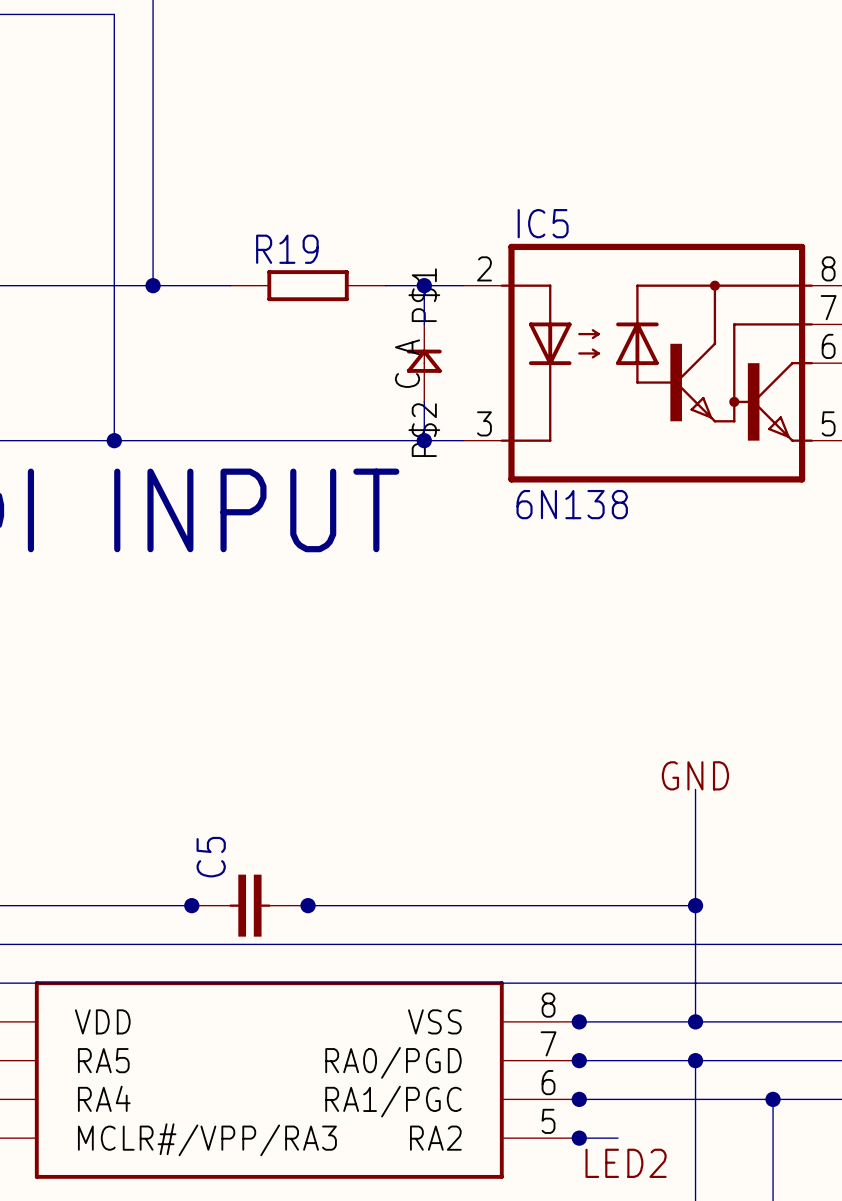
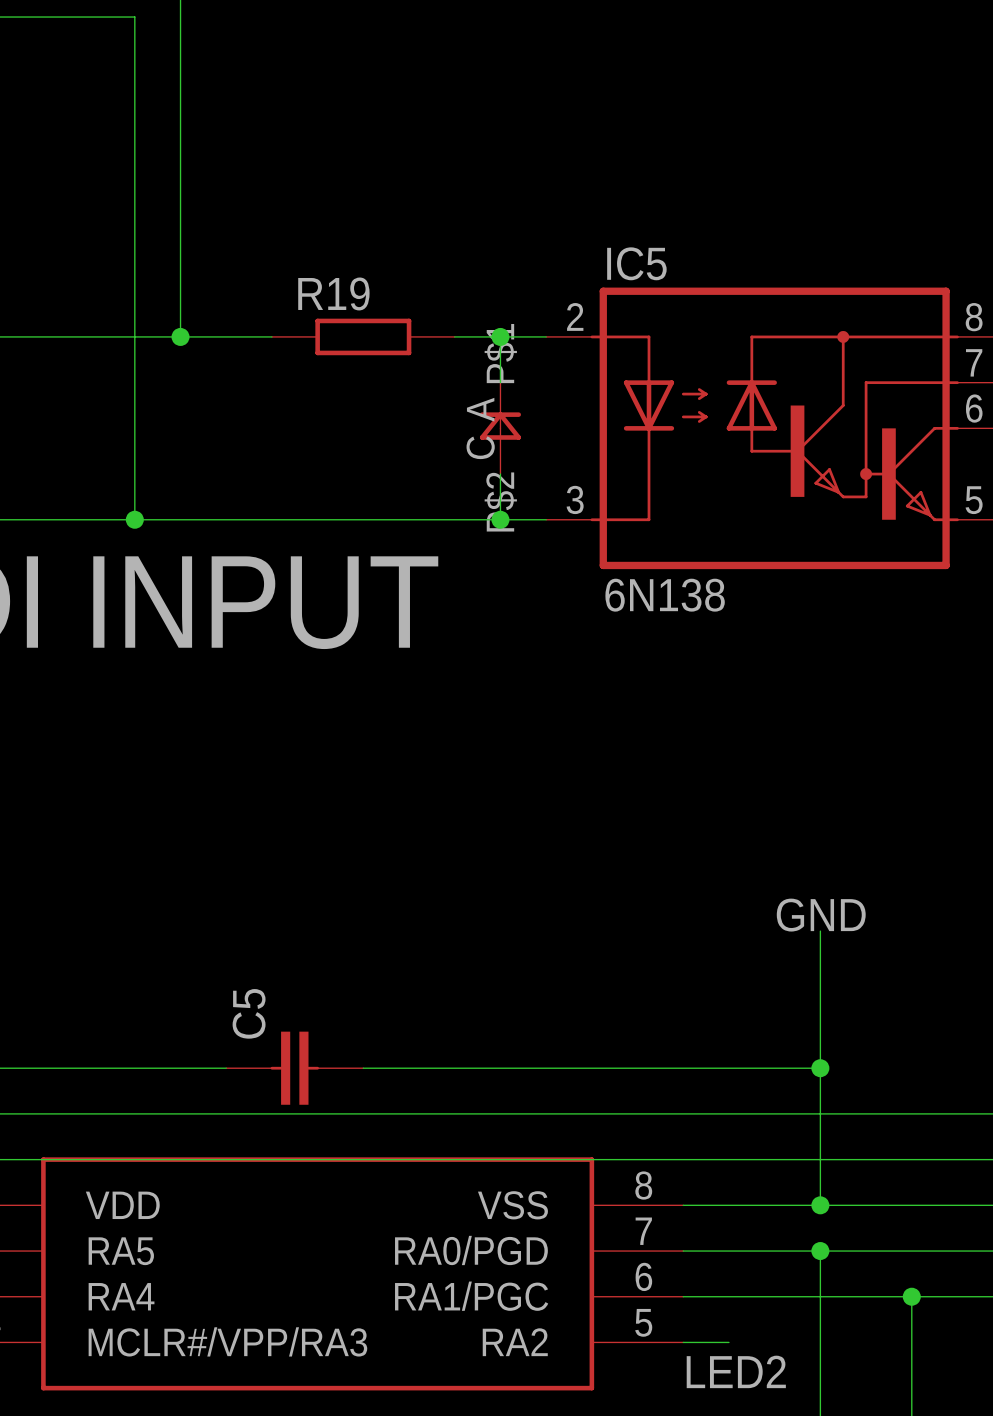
junction: (191, 905) -> none
junction: (308, 905) -> none
junction: (579, 1021) -> none
junction: (579, 1060) -> none
junction: (579, 1099) -> none
junction: (579, 1138) -> none

